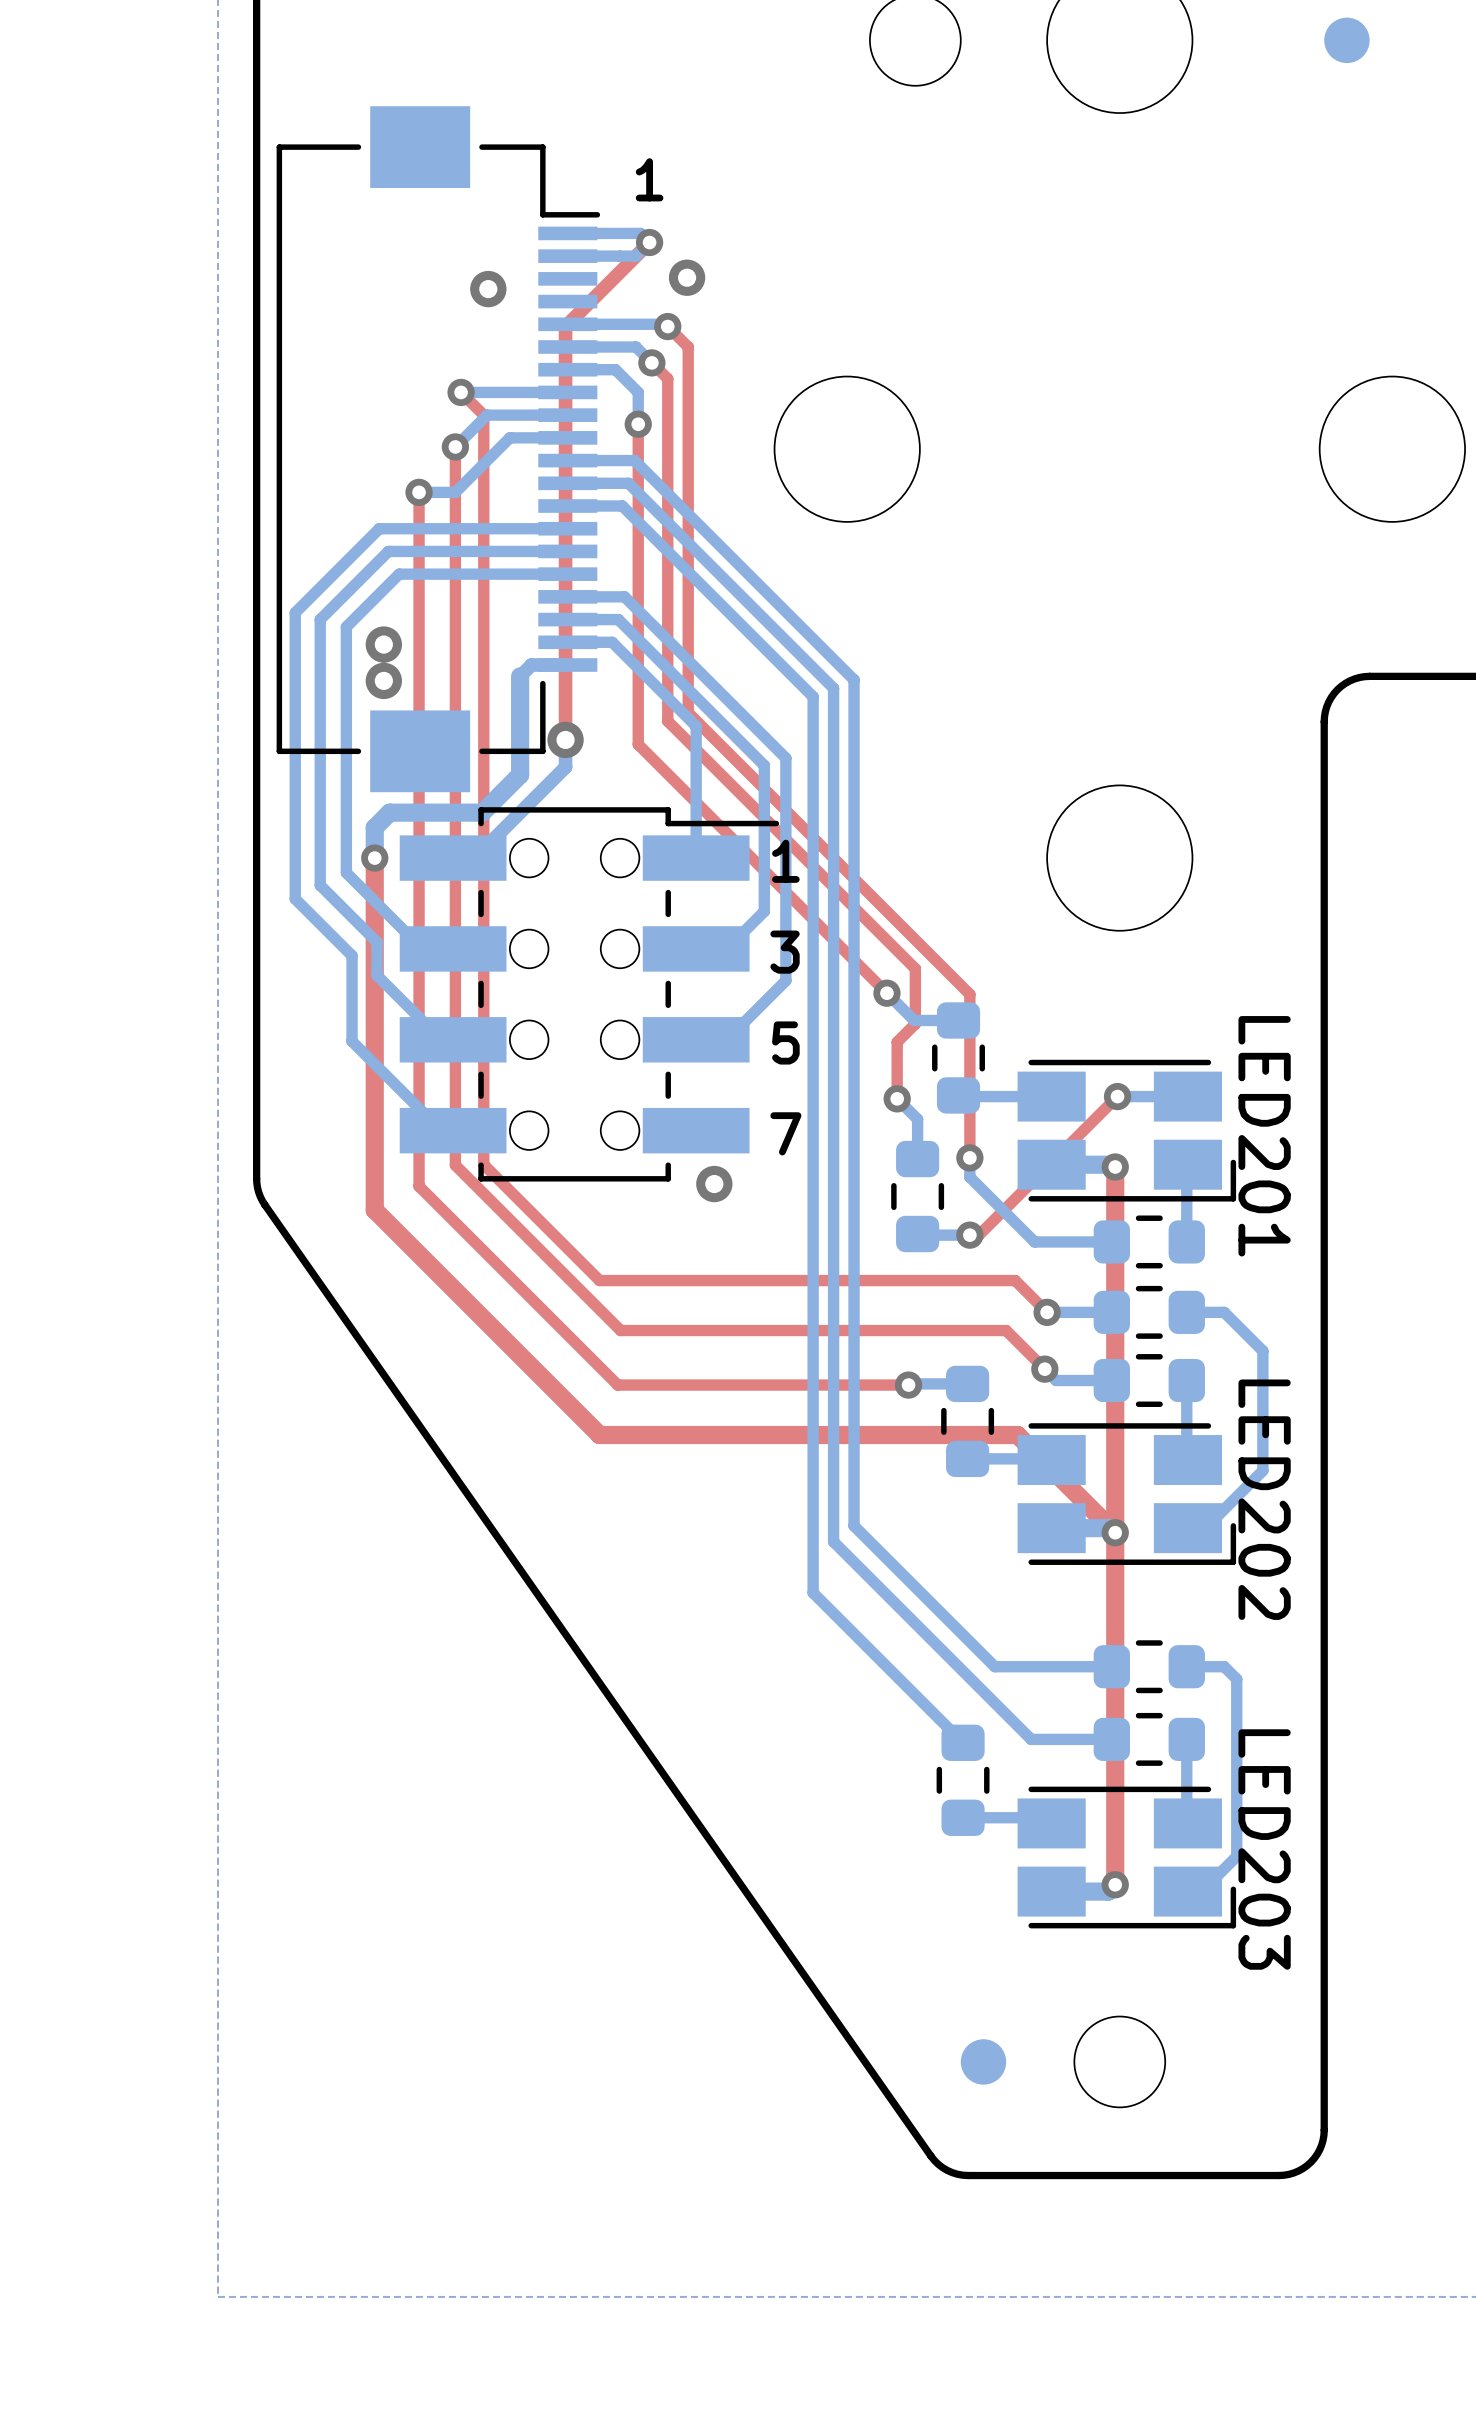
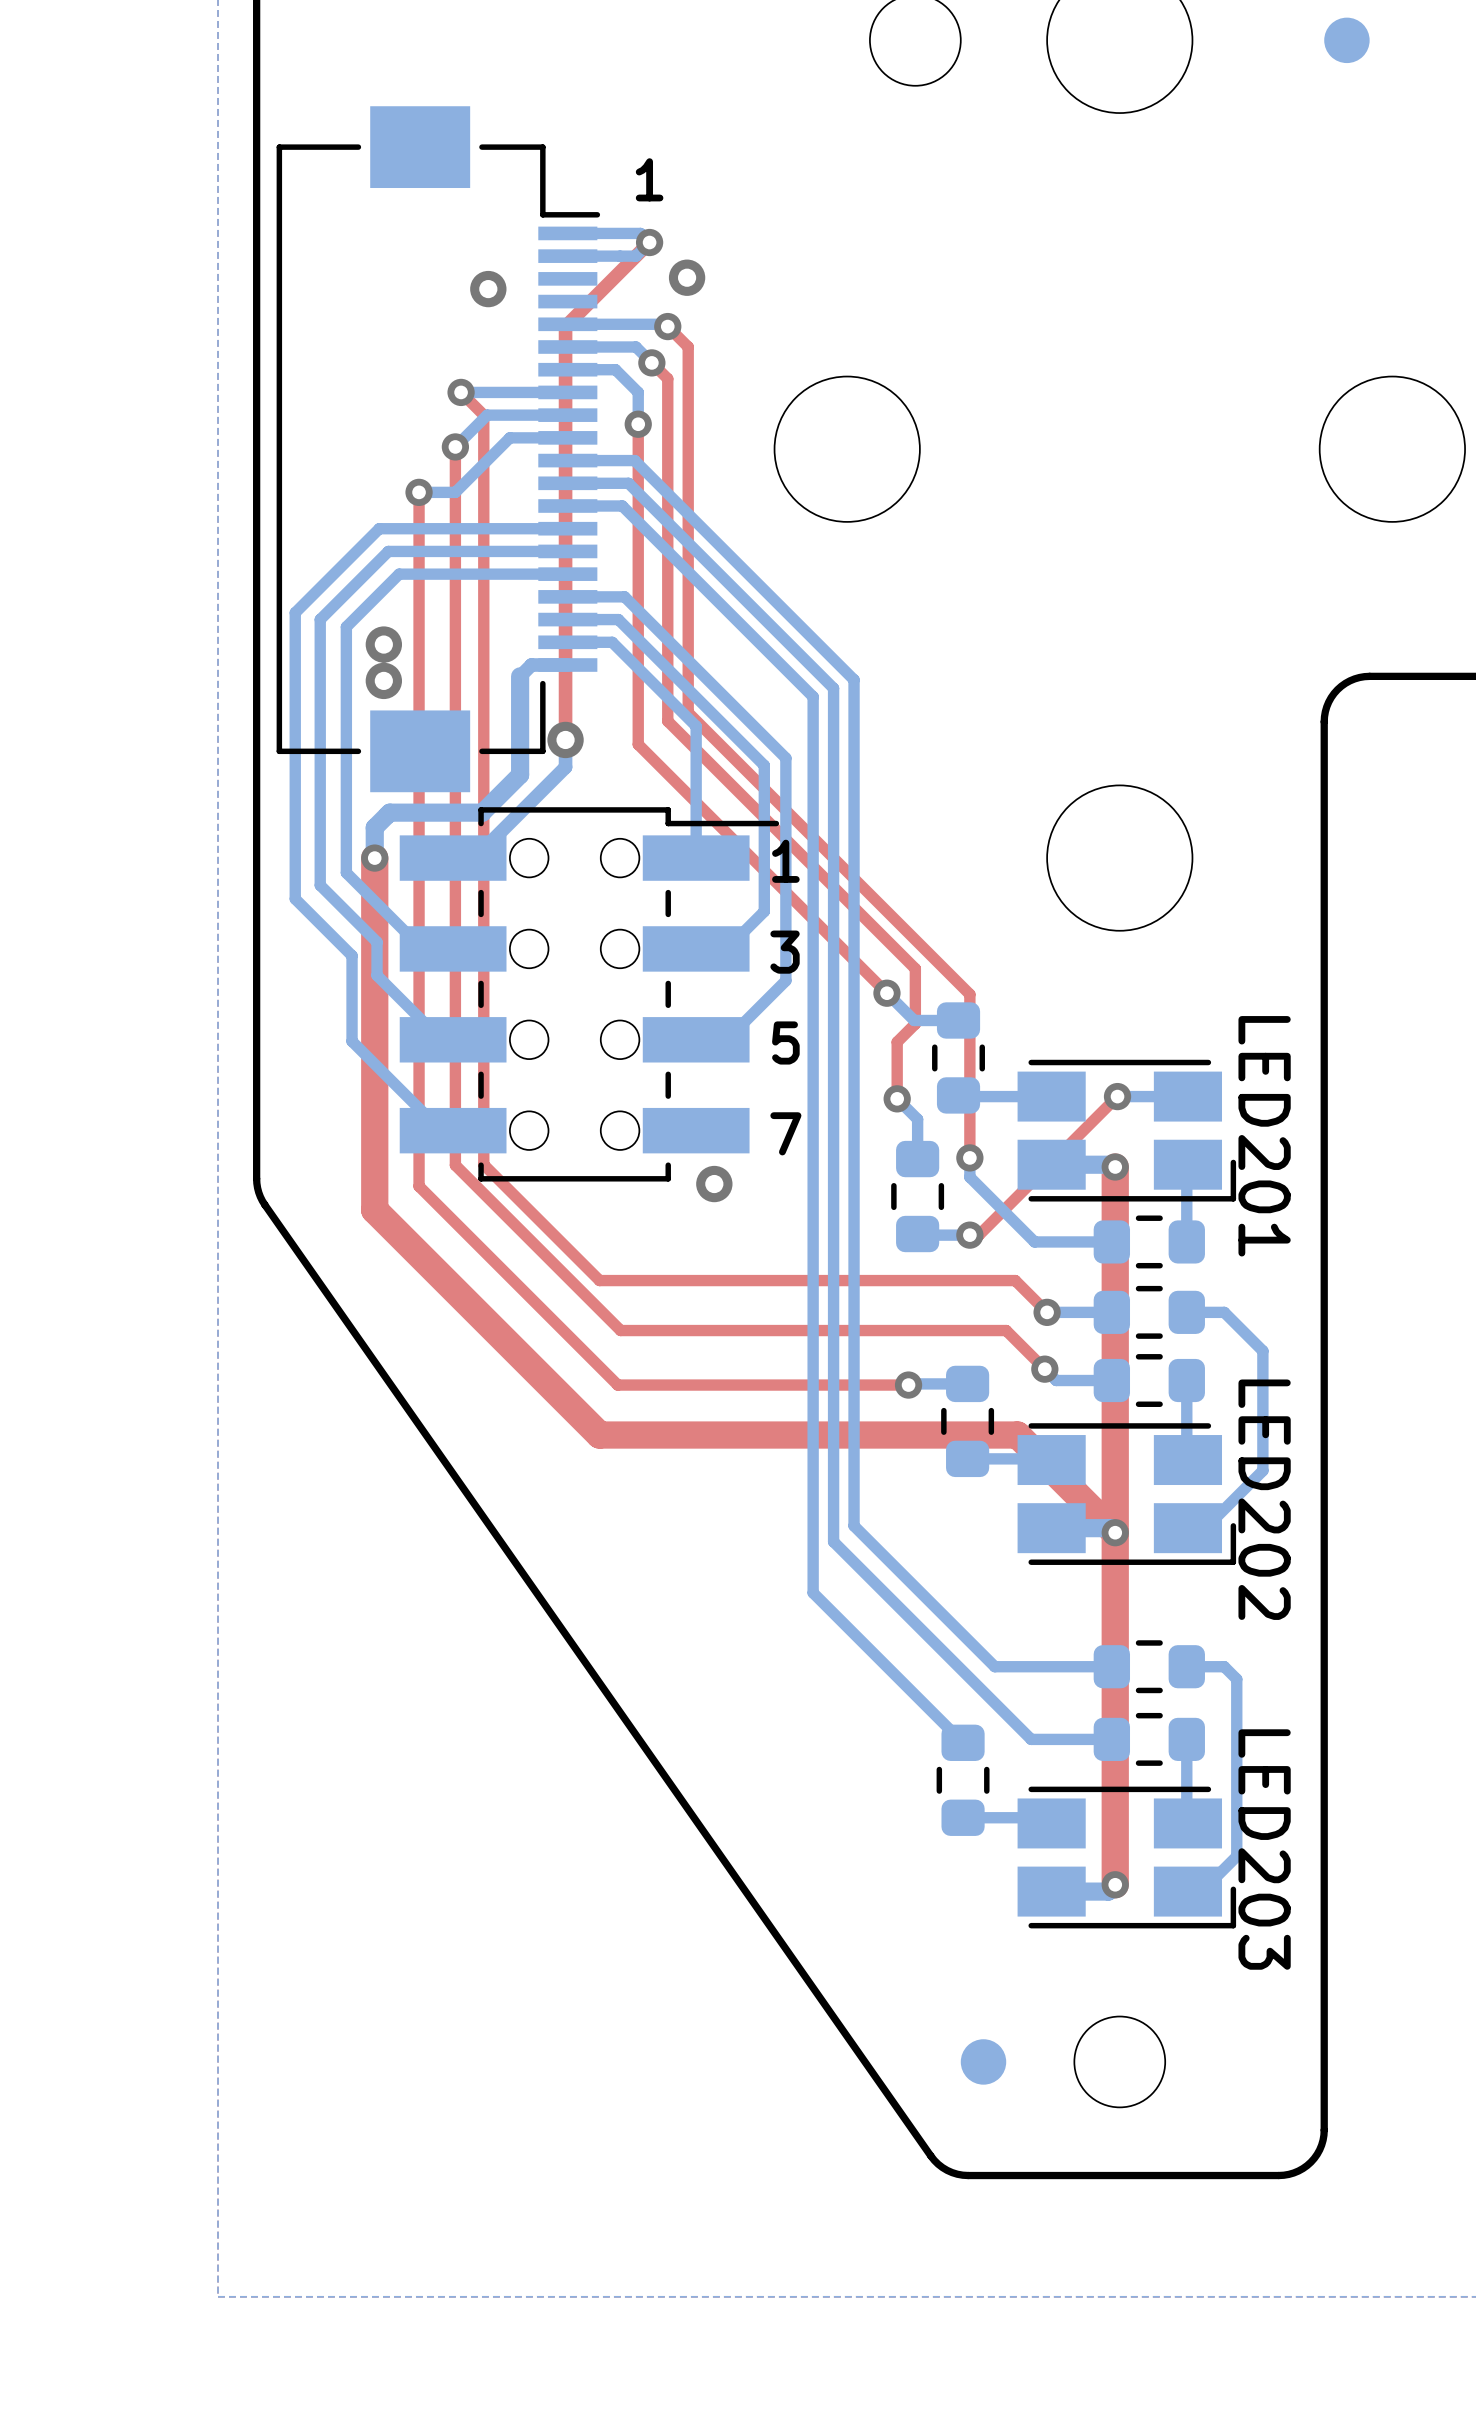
top track width: thin (374, 858) (374, 1210) (599, 1435) (1017, 1435) (1115, 1532) -> thick (374, 858) (374, 1210) (599, 1435) (1017, 1435) (1115, 1532)
top track width: thin (1115, 1167) (1115, 1884) -> thick (1115, 1167) (1115, 1884)

